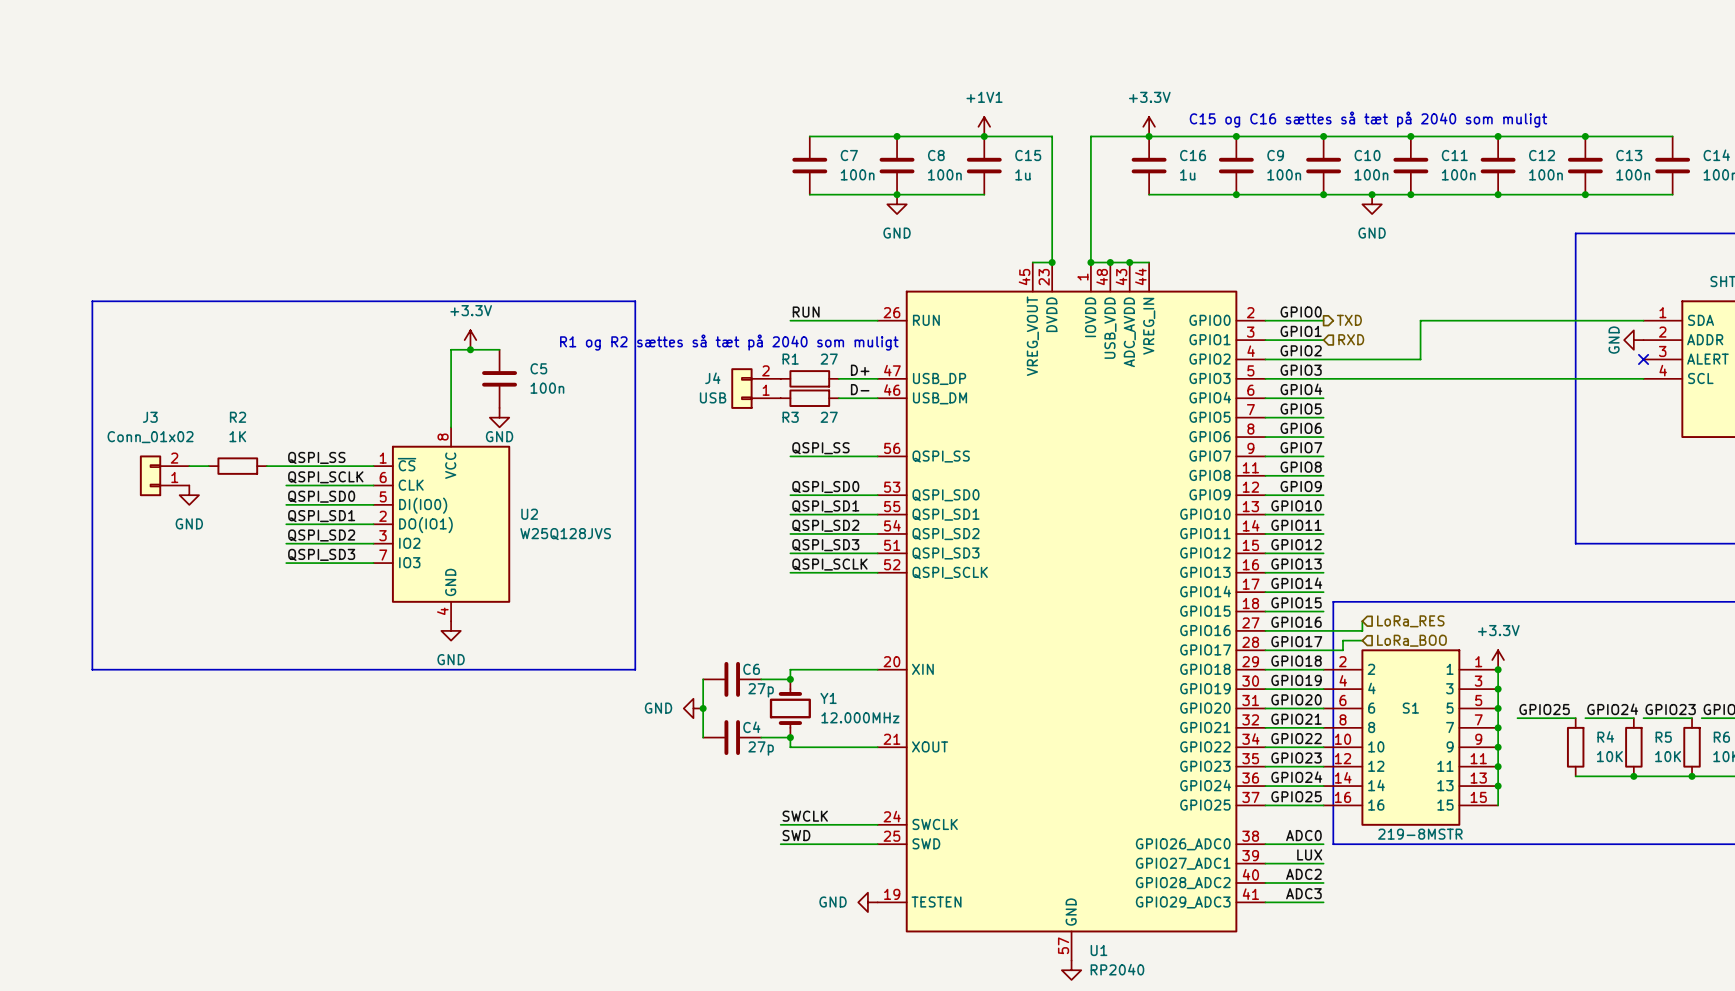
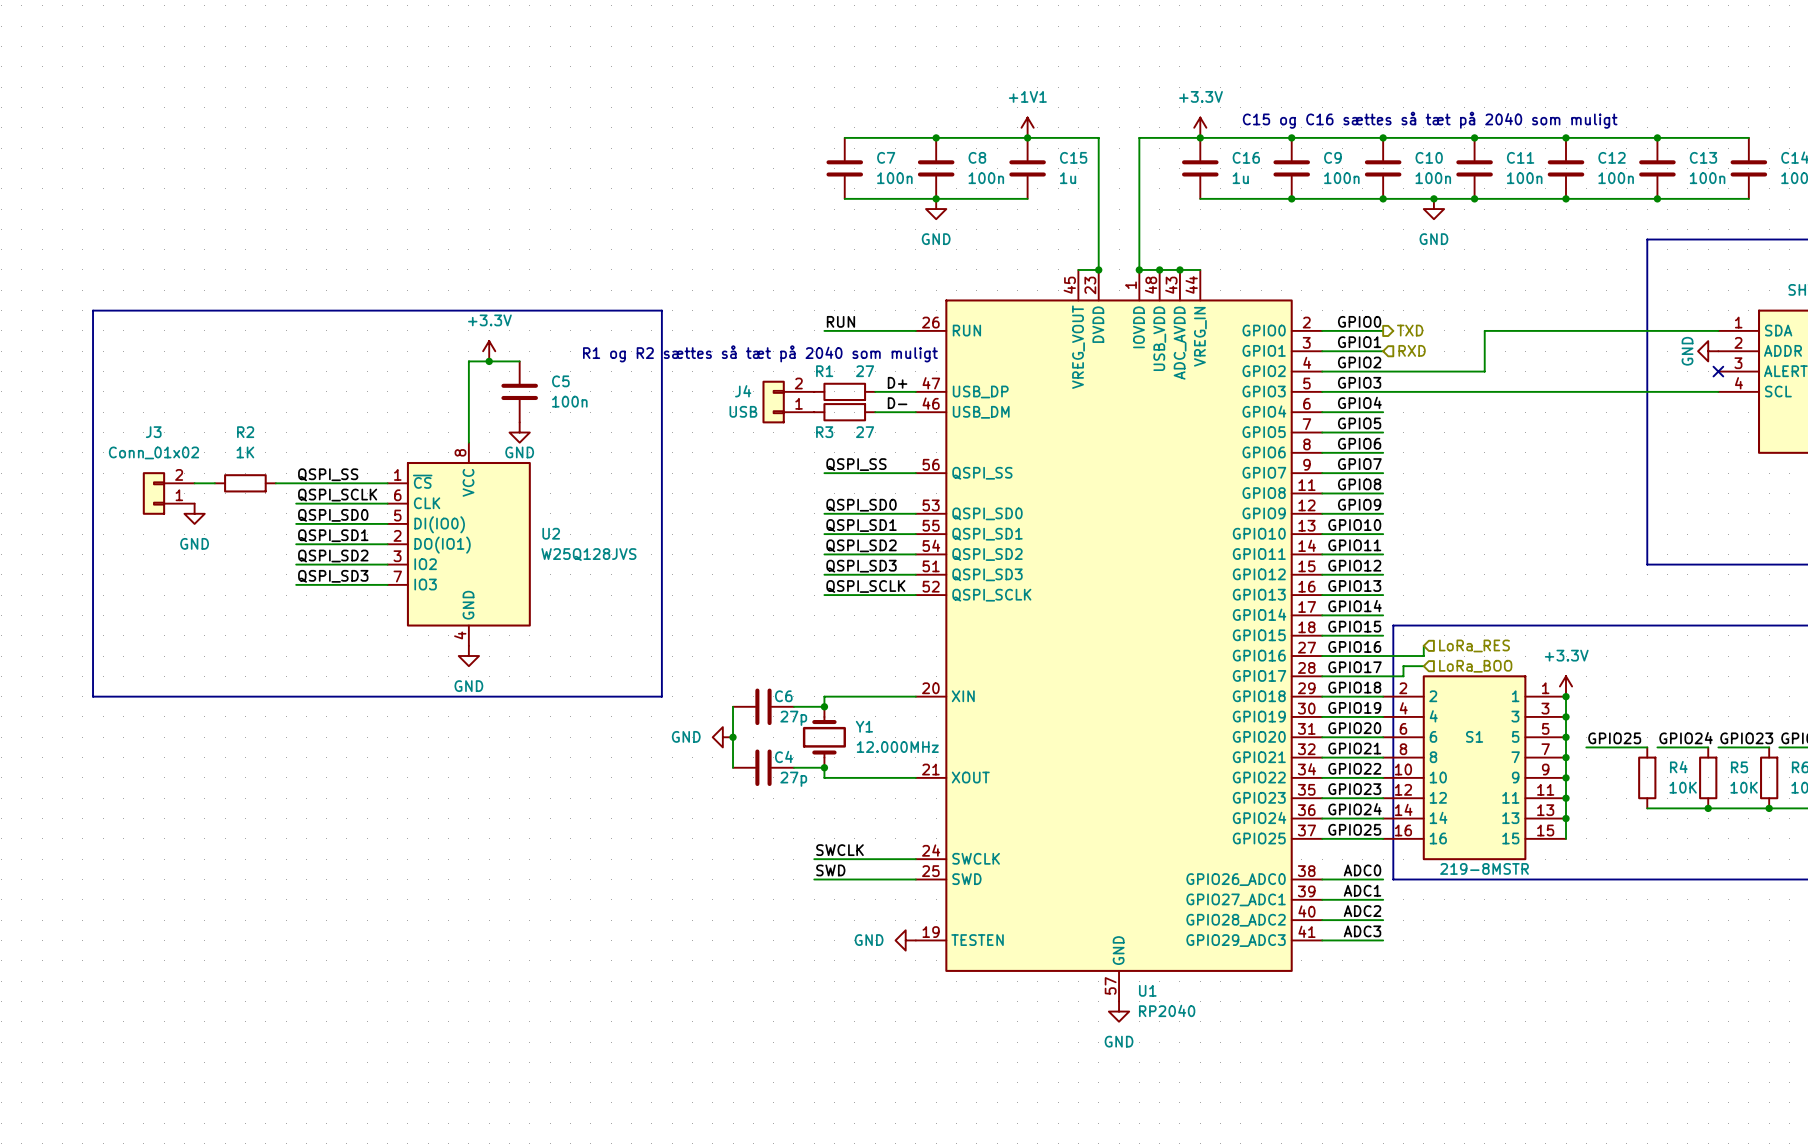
label: LUX (1309, 854) -> ADC1 (1362, 890)

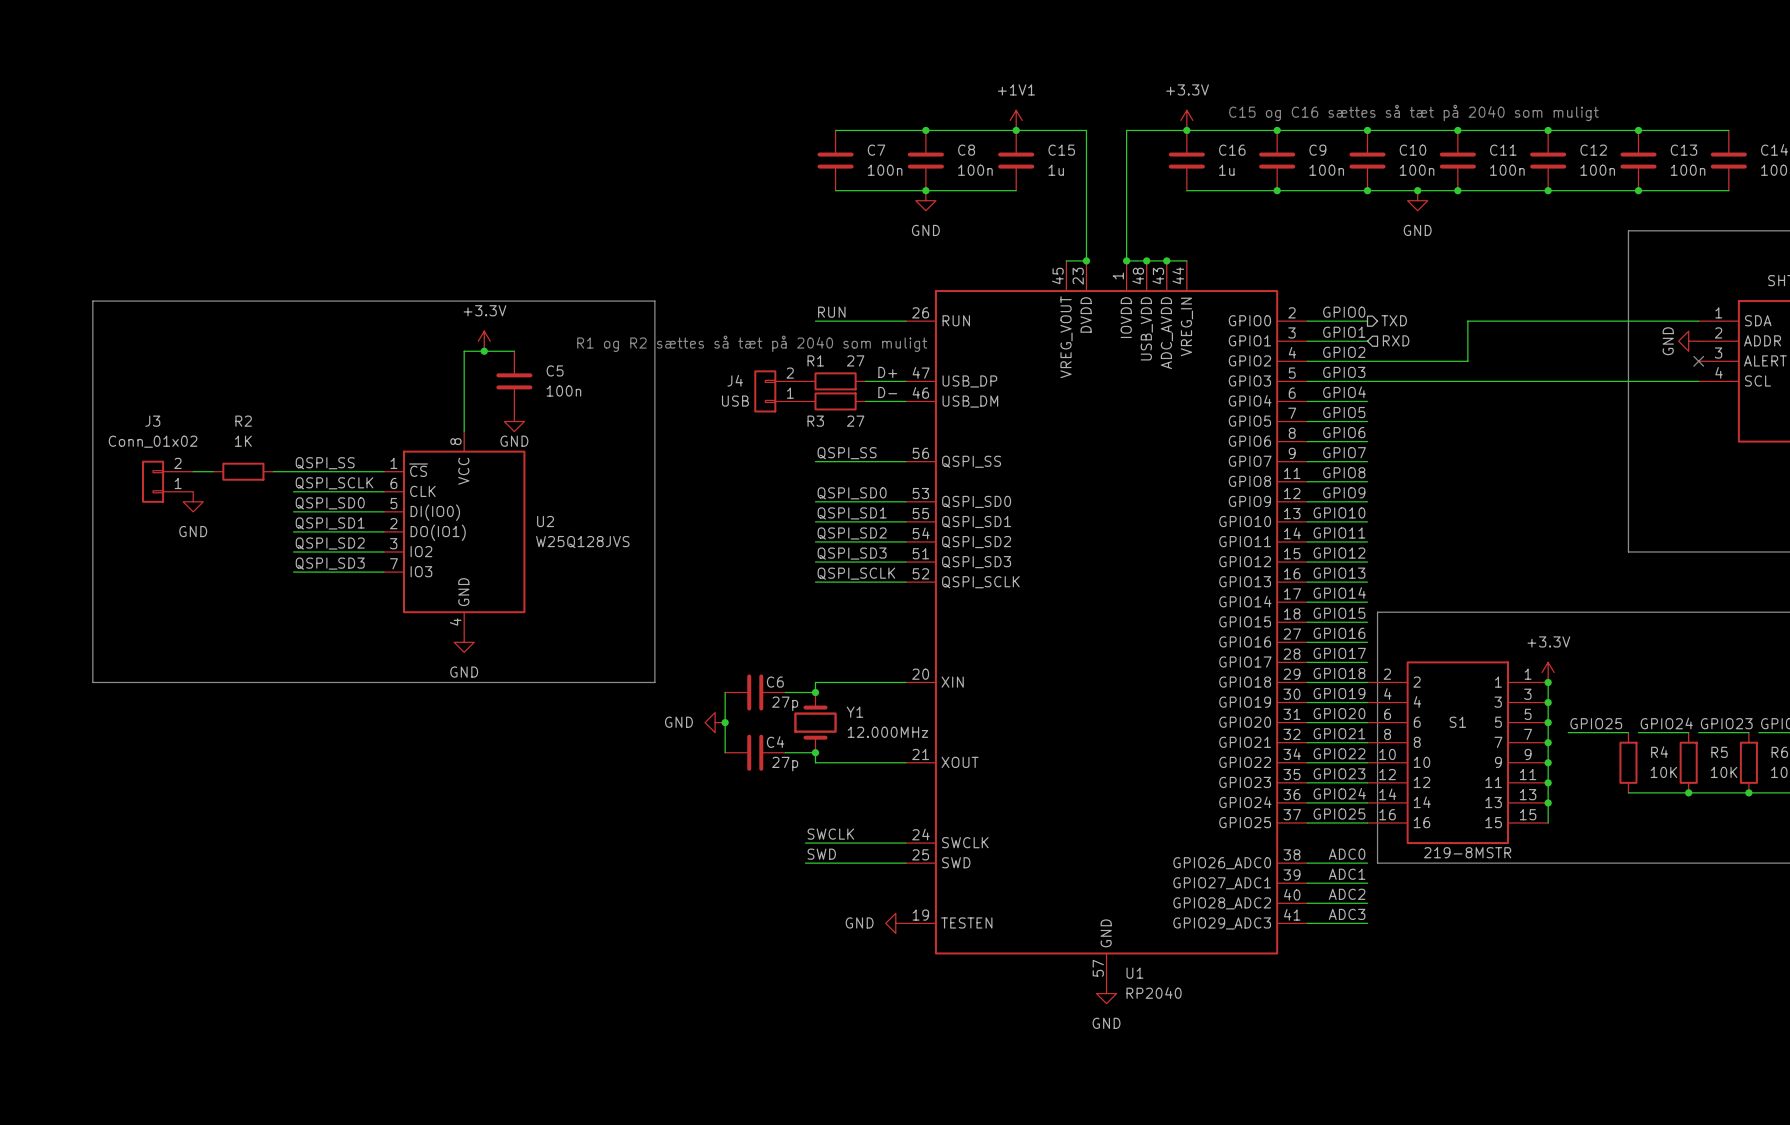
wire: (1423, 645) (1423, 656) (1383, 656) -> none
hierarchical label: LoRa_RES (1474, 645) -> none
wire: (1423, 666) (1403, 666) (1403, 676) (1383, 676) -> none
hierarchical label: LoRa_BOO (1475, 666) -> none

